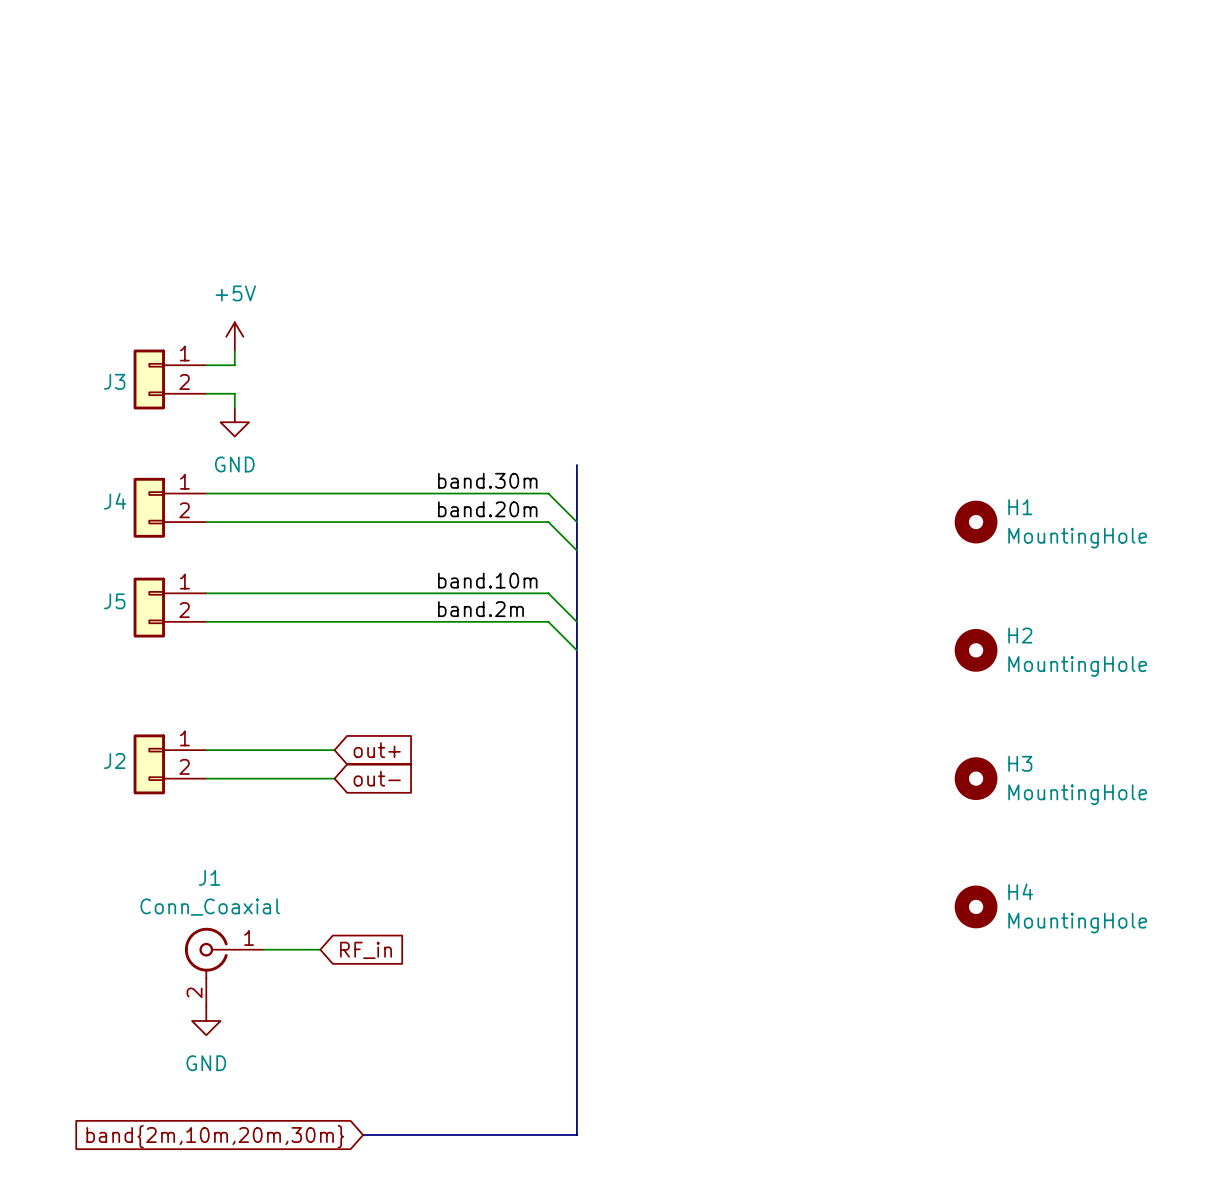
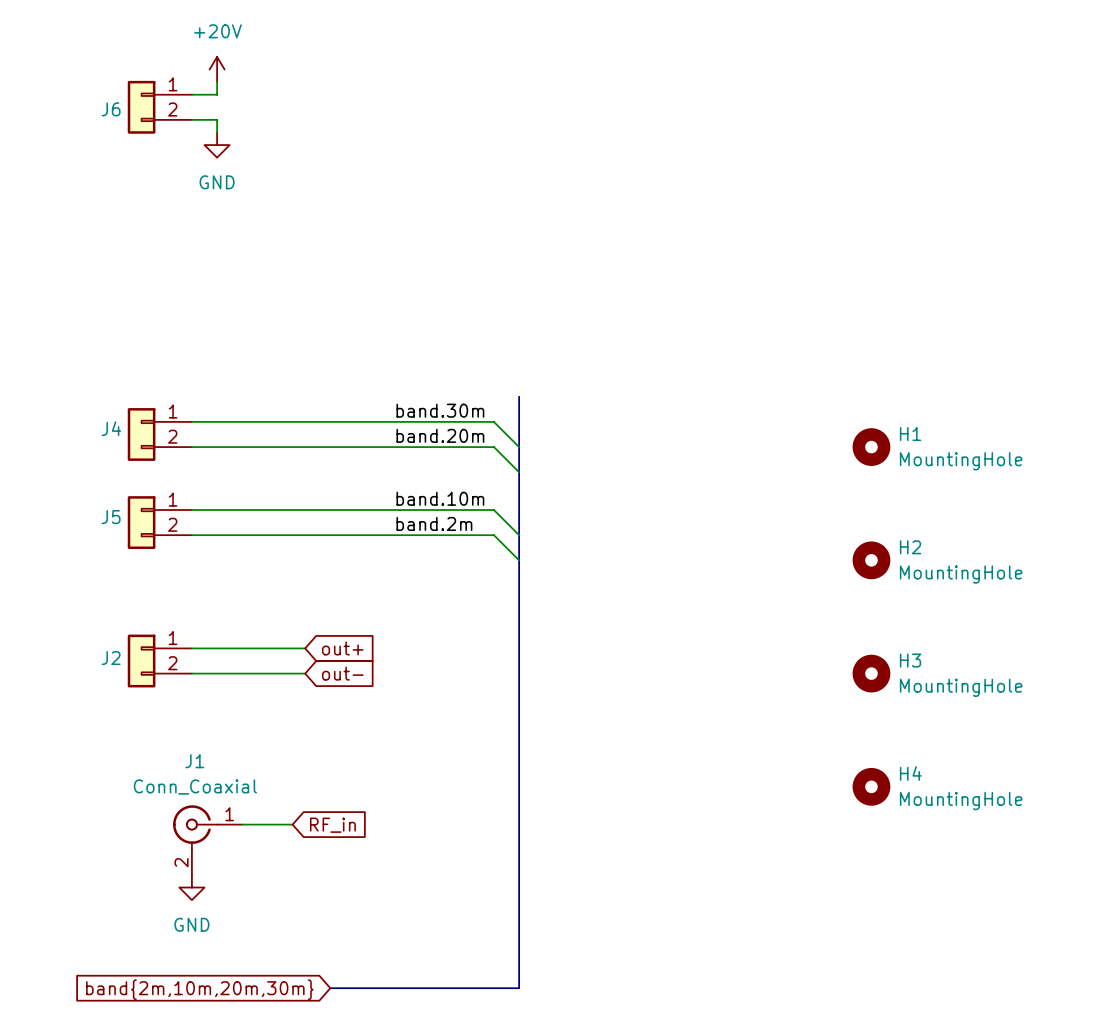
power symbol: none -> +20V (217, 69)
J6: none -> (159, 107)
power symbol: +5V (234, 336) -> none
wire: (234, 350) (234, 365) (206, 365) -> (217, 82) (217, 94) (191, 94)
J3: (169, 379) -> none
wire: (206, 393) (234, 393) (234, 408) -> (191, 119) (217, 119) (217, 132)
power symbol position: GND (234, 422) -> GND (217, 145)

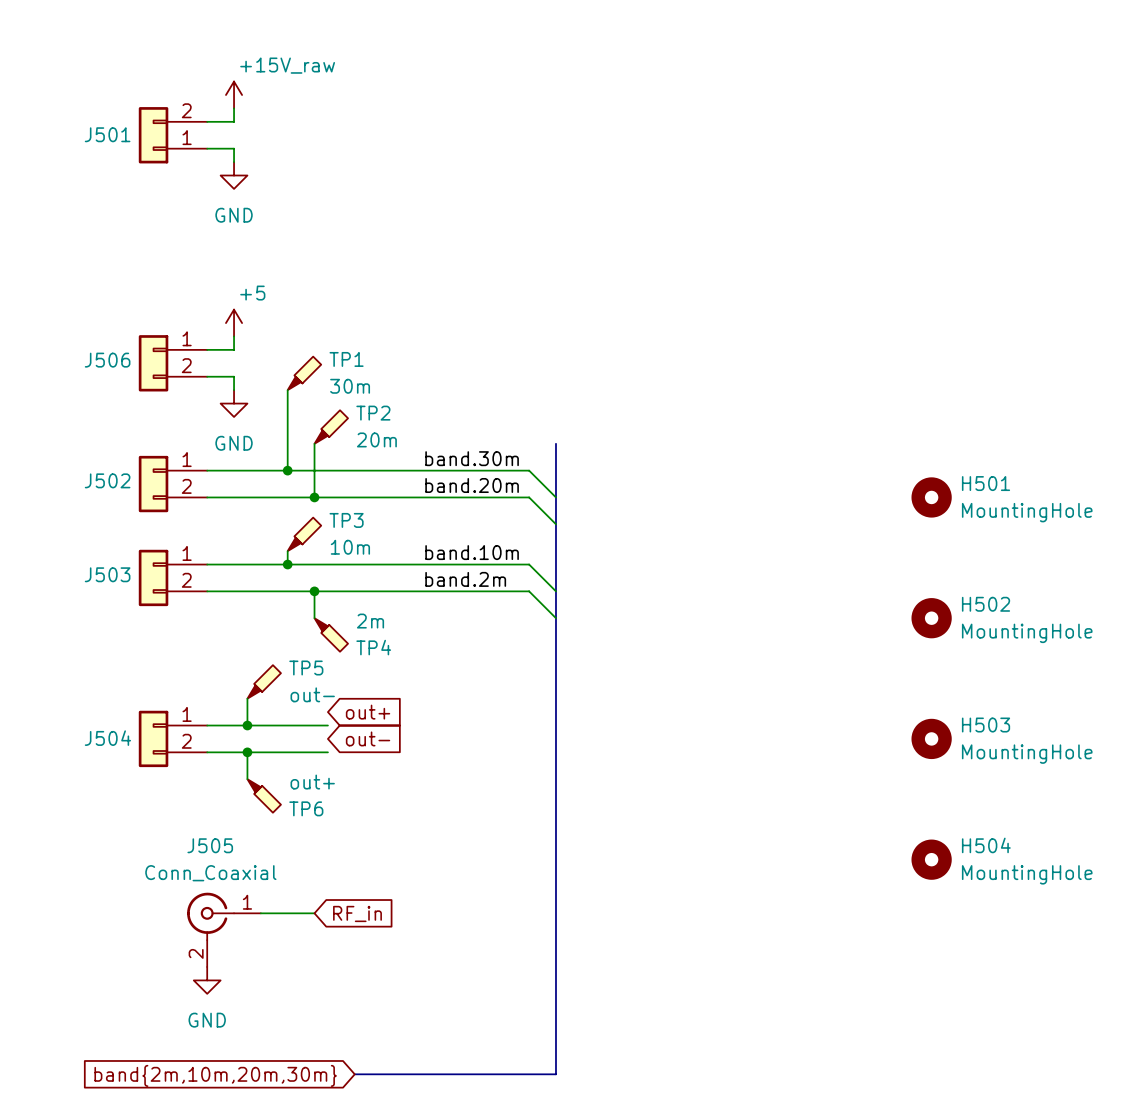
power symbol: +20V (217, 69) -> +15V_raw (234, 95)
J6 flip: as is (141, 107) -> up-down (153, 135)
J6 name: J6 (111, 109) -> J501 (107, 134)
power symbol: none -> +5 (234, 323)
wire: none -> (234, 336) (234, 349) (207, 349)
J506: none -> (172, 363)
TP1: none -> 30m (304, 373)
wire: none -> (207, 376) (234, 376) (234, 390)
wire: none -> (287, 390) (287, 470)
power symbol: none -> GND (234, 403)
TP2: none -> 20m (331, 427)
wire: none -> (314, 443) (314, 497)
junction: none -> (287, 470)
J4 name: J4 (111, 428) -> J502 (107, 480)
H1 name: H1 (910, 434) -> H501 (986, 483)
junction: none -> (314, 497)
TP3: none -> 10m (304, 534)
wire: none -> (287, 551) (287, 564)
junction: none -> (287, 564)
J5 name: J5 (111, 517) -> J503 (107, 574)
wire: none -> (314, 591) (314, 618)
junction: none -> (314, 591)
H2 name: H2 (910, 547) -> H502 (986, 604)
TP4: none -> 2m (331, 634)
TP5: none -> out- (264, 681)
wire: none -> (247, 698) (247, 725)
wire: (191, 648) (305, 648) -> (207, 725) (327, 725)
H3 name: H3 (910, 660) -> H503 (986, 725)
J2: (159, 661) -> none
junction: none -> (247, 725)
J504: none -> (172, 738)
wire: (191, 673) (305, 673) -> (207, 752) (327, 752)
wire: none -> (247, 752) (247, 779)
junction: none -> (247, 752)
TP6: none -> out+ (264, 795)
H4 name: H4 (910, 773) -> H504 (986, 845)
wire: (242, 824) (292, 824) -> (260, 913) (314, 913)
global label position: RF_in (332, 825) -> RF_in (357, 913)
J1: Conn_Coaxial (207, 840) -> none
J505: none -> Conn_Coaxial (223, 929)
power symbol position: GND (191, 887) -> GND (207, 980)

